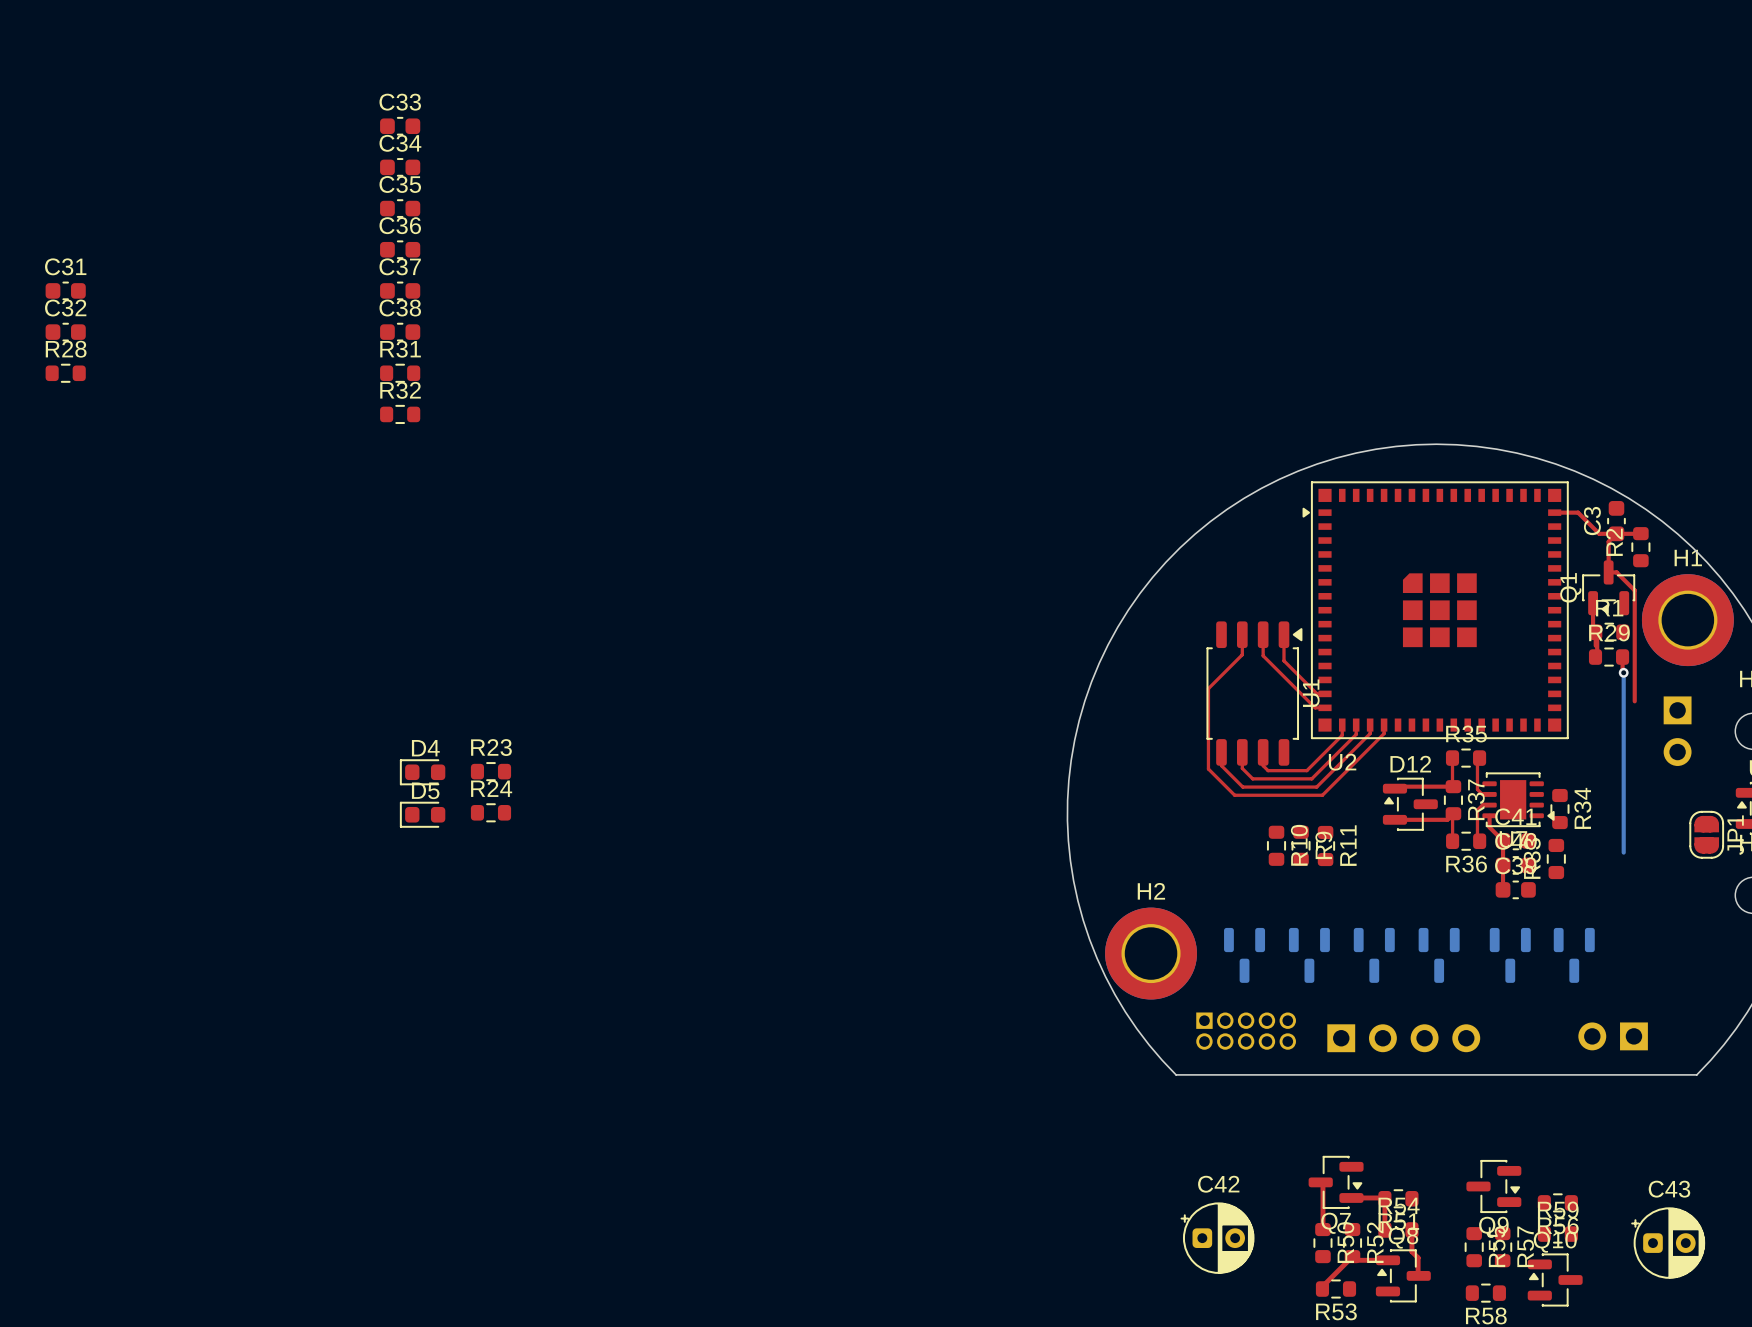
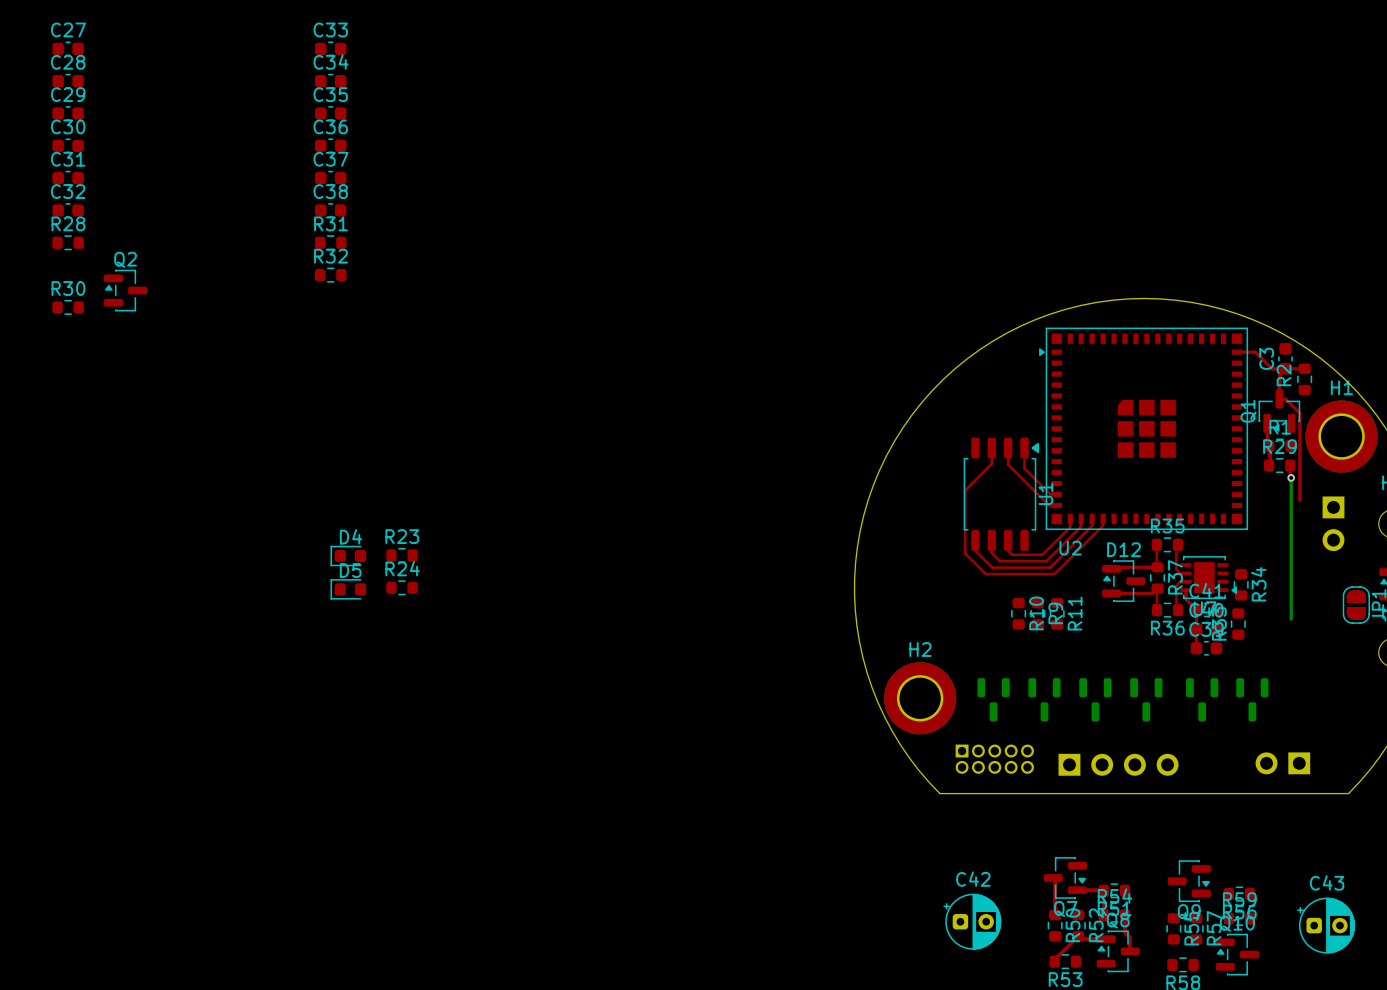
C27: none -> (68, 48)
C28: none -> (68, 81)
C29: none -> (68, 113)
C30: none -> (68, 145)
Q2: none -> (125, 290)
R30: none -> (68, 307)

